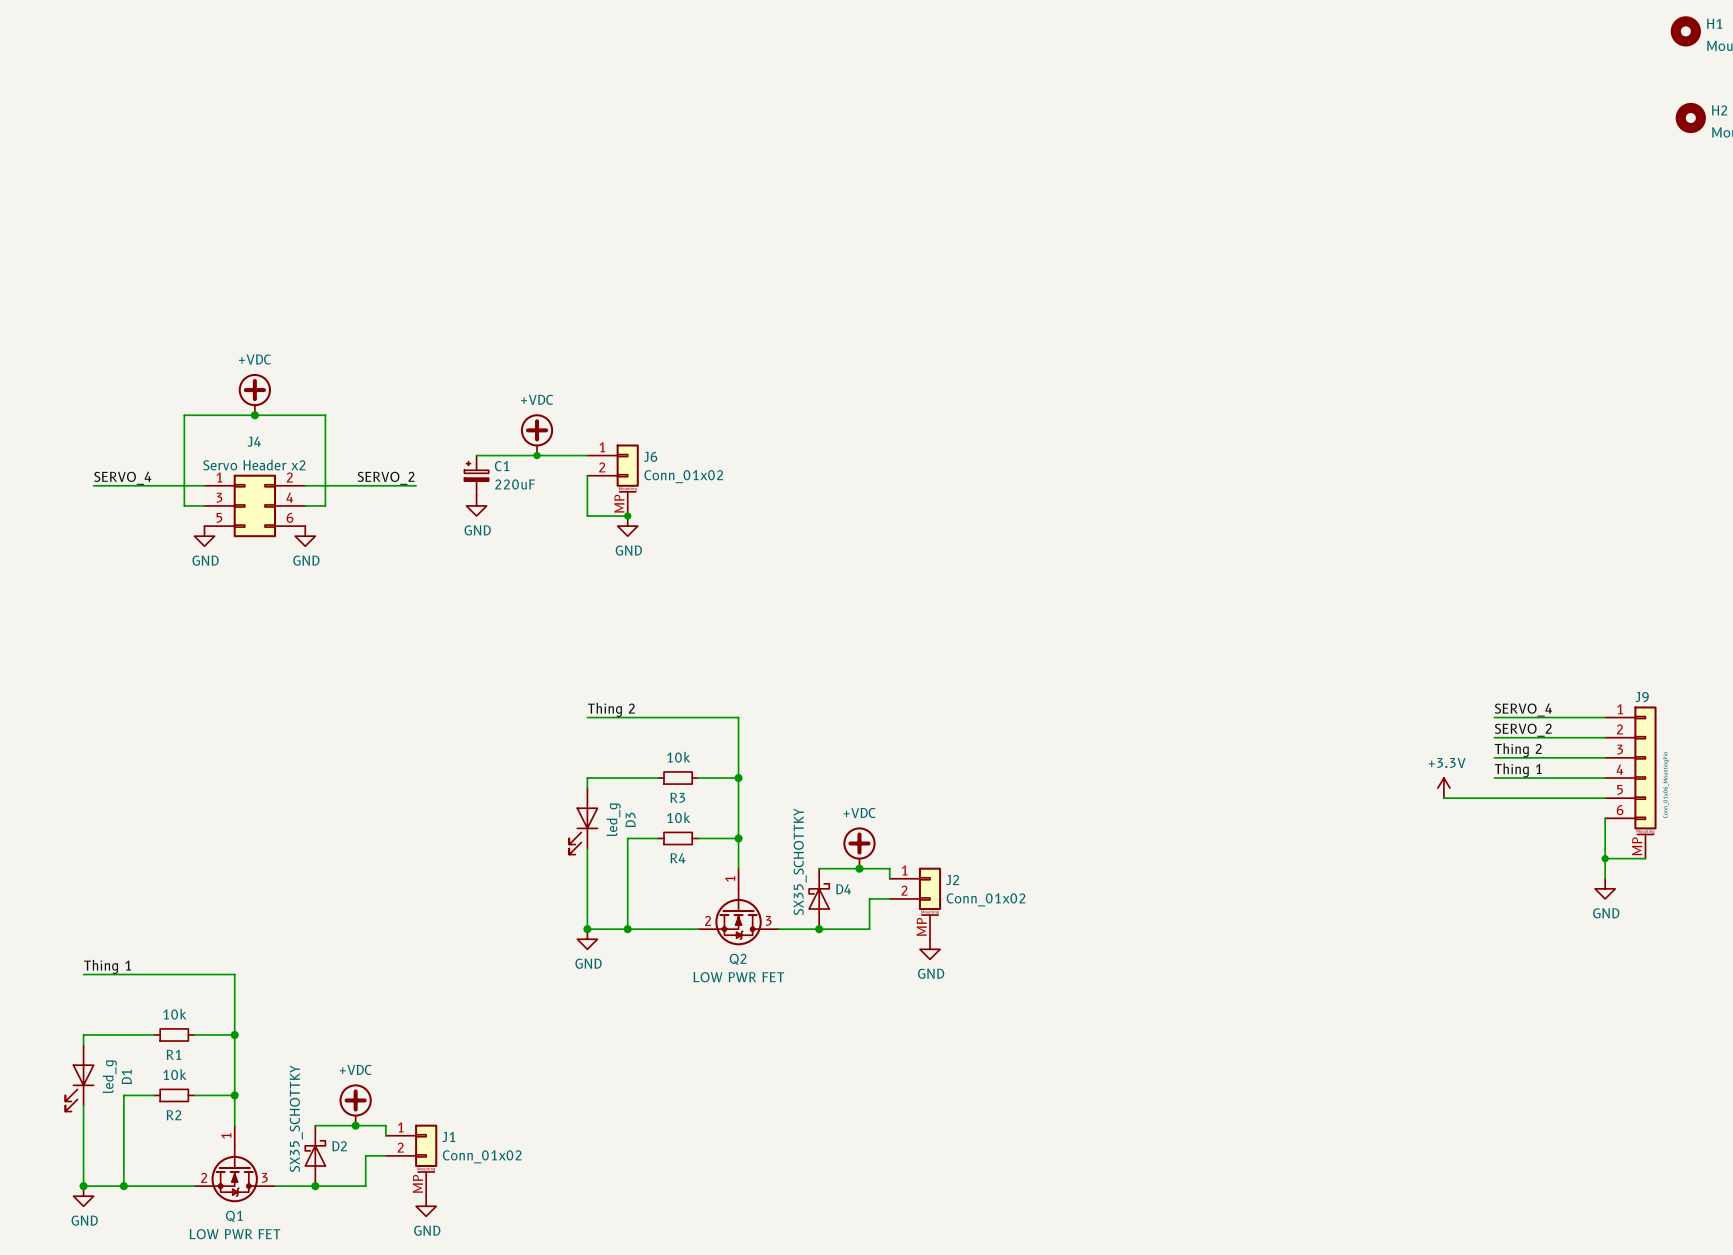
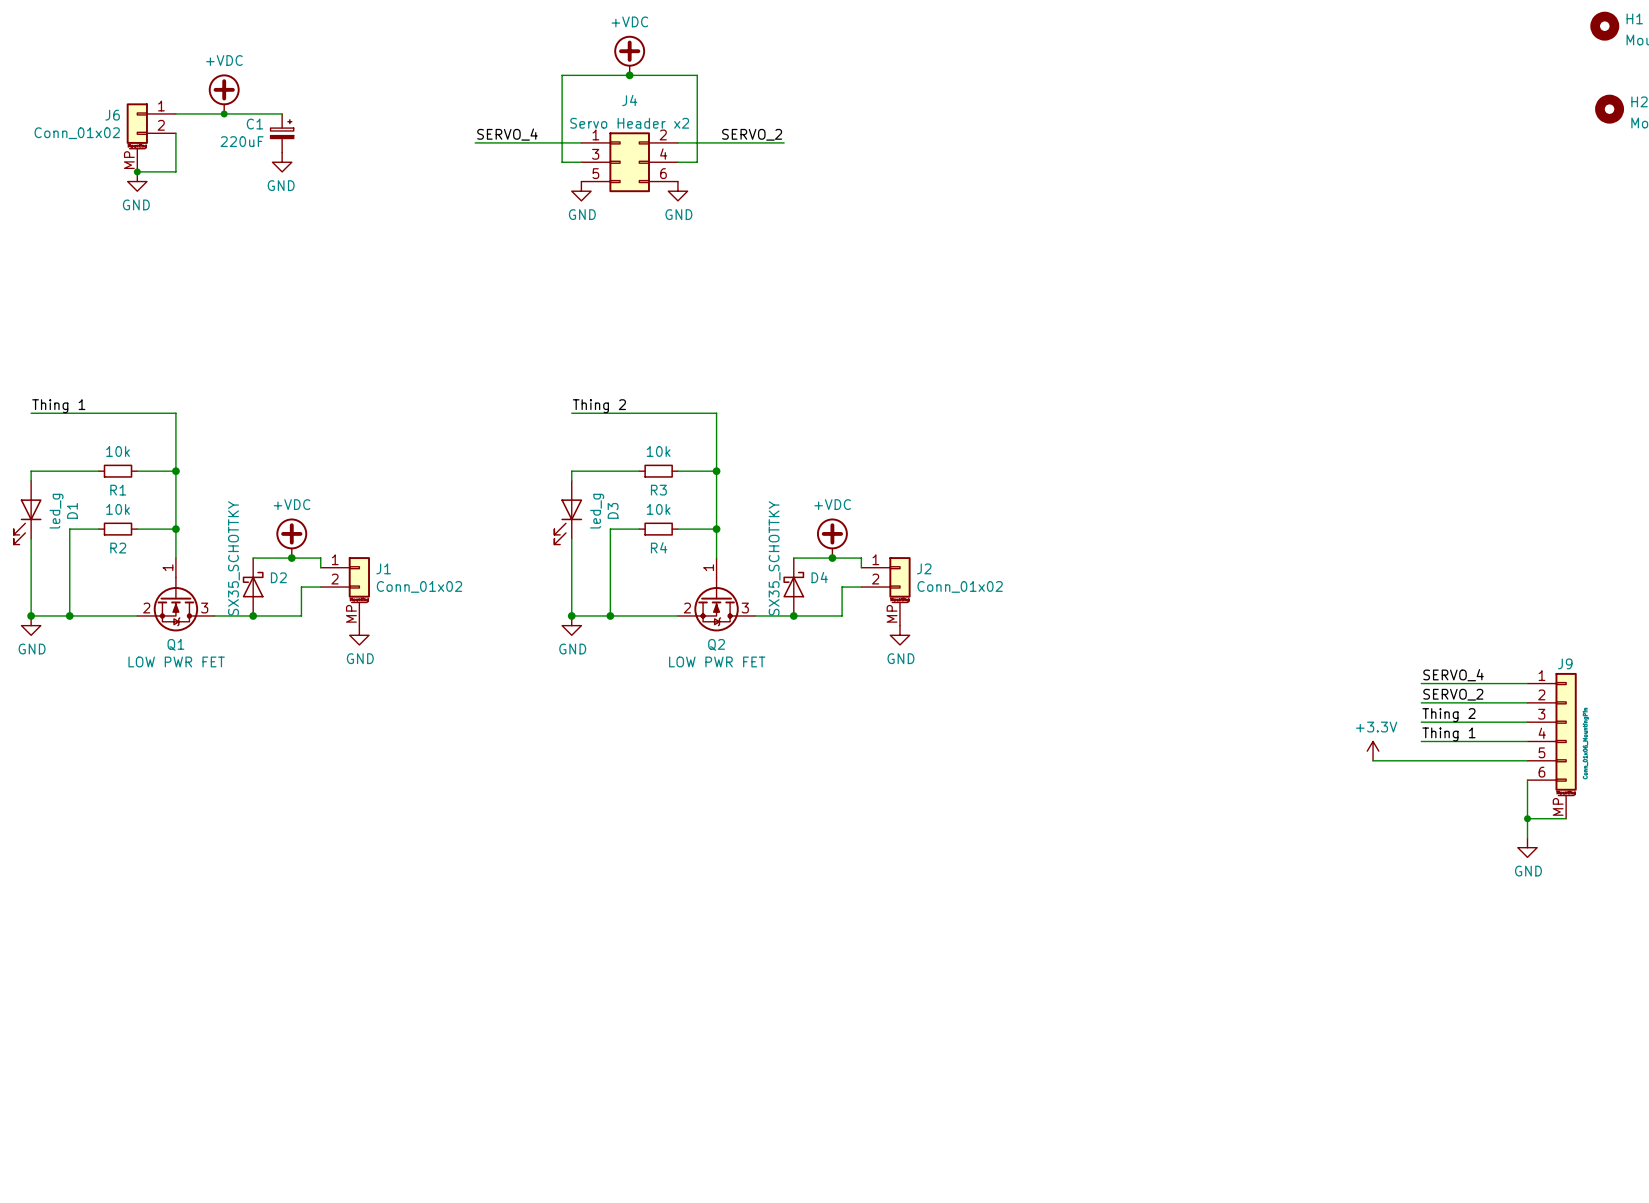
power symbol: none -> +VDC (629, 55)
junction: none -> (629, 75)
power symbol: none -> +VDC (224, 94)
wire: none -> (175, 113) (282, 113)
junction: none -> (224, 113)
wire: none -> (175, 133) (175, 171) (137, 171)
label: none -> SERVO_4 (507, 134)
label: none -> SERVO_2 (752, 134)
wire: none -> (475, 142) (581, 142)
wire: none -> (677, 142) (784, 142)
power symbol: none -> GND (282, 162)
wire: none -> (581, 162) (562, 162) (562, 75) (697, 75) (697, 162) (677, 162)
junction: none -> (137, 171)
power symbol: none -> GND (137, 181)
power symbol: none -> GND (581, 191)
power symbol: none -> GND (677, 191)
power symbol: +VDC (254, 394) -> none
junction: (254, 415) -> none
label: none -> Thing 1 (58, 406)
label: none -> Thing 2 (599, 406)
power symbol: +VDC (537, 434) -> none
wire: none -> (31, 413) (175, 413) (175, 558)
wire: none -> (571, 413) (716, 413) (716, 558)
wire: (476, 455) (587, 455) -> none
junction: (537, 455) -> none
J6 flip: as is (627, 468) -> left-right (137, 126)
C1 flip: as is (476, 471) -> left-right (282, 129)
C1 position: (476, 475) -> (282, 133)
wire: (587, 475) (587, 516) (627, 516) -> none
label: SERVO_4 (122, 478) -> none
label: SERVO_2 (386, 478) -> none
J6 position: (613, 480) -> (151, 137)
wire: (93, 485) (204, 485) -> none
wire: (305, 485) (416, 485) -> none
wire: none -> (98, 471) (31, 471) (31, 480)
wire: none -> (137, 471) (175, 471)
junction: none -> (175, 471)
wire: none -> (639, 471) (571, 471) (571, 480)
wire: none -> (677, 471) (716, 471)
junction: none -> (716, 471)
wire: (204, 505) (184, 505) (184, 415) (325, 415) (325, 505) (305, 505) -> none
J4 position: (254, 505) -> (629, 162)
power symbol: GND (476, 505) -> none
junction: (627, 516) -> none
power symbol: GND (627, 526) -> none
power symbol: GND (204, 536) -> none
power symbol: GND (305, 536) -> none
wire: none -> (98, 529) (69, 529) (69, 615)
wire: none -> (137, 529) (175, 529)
junction: none -> (175, 529)
wire: none -> (639, 529) (610, 529) (610, 615)
wire: none -> (677, 529) (716, 529)
junction: none -> (716, 529)
power symbol: none -> +VDC (291, 538)
power symbol: none -> +VDC (832, 538)
wire: none -> (31, 538) (31, 615) (137, 615)
wire: none -> (571, 538) (571, 615) (677, 615)
wire: none -> (253, 558) (320, 558) (320, 567)
junction: none -> (291, 558)
wire: none -> (793, 558) (861, 558) (861, 567)
junction: none -> (832, 558)
wire: none -> (320, 587) (301, 587) (301, 615) (214, 615)
wire: none -> (861, 587) (842, 587) (842, 615) (755, 615)
junction: none -> (31, 615)
junction: none -> (69, 615)
junction: none -> (253, 615)
junction: none -> (571, 615)
junction: none -> (610, 615)
junction: none -> (793, 615)
power symbol: none -> GND (31, 625)
power symbol: none -> GND (571, 625)
power symbol: none -> GND (359, 635)
power symbol: none -> GND (899, 635)
label: Thing 2 (611, 709) -> none
wire: (587, 717) (738, 717) (738, 868) -> none
wire: (657, 778) (587, 778) (587, 788) -> none
R3 position: (678, 778) -> (658, 471)
wire: (698, 778) (738, 778) -> none
junction: (738, 778) -> none
D3 position: (583, 821) -> (568, 512)
wire: (657, 838) (627, 838) (627, 929) -> none
R4 position: (678, 838) -> (658, 529)
wire: (698, 838) (738, 838) -> none
junction: (738, 838) -> none
wire: (587, 848) (587, 929) (698, 929) -> none
power symbol: +VDC (859, 848) -> none
wire: (819, 868) (889, 868) (889, 878) -> none
junction: (859, 868) -> none
D4 position: (819, 898) -> (793, 587)
wire: (889, 898) (869, 898) (869, 929) (778, 929) -> none
J2 position: (915, 903) -> (885, 591)
Q2 position: (738, 907) -> (716, 594)
junction: (587, 929) -> none
junction: (627, 929) -> none
junction: (819, 929) -> none
power symbol: GND (587, 939) -> none
power symbol: GND (930, 949) -> none
label: Thing 1 (107, 966) -> none
wire: (83, 974) (234, 974) (234, 1125) -> none
wire: (154, 1034) (83, 1034) (83, 1045) -> none
R1 position: (174, 1034) -> (118, 471)
wire: (194, 1034) (234, 1034) -> none
junction: (234, 1034) -> none
D1 position: (79, 1078) -> (27, 512)
wire: (154, 1095) (123, 1095) (123, 1186) -> none
R2 position: (174, 1095) -> (118, 529)
wire: (194, 1095) (234, 1095) -> none
junction: (234, 1095) -> none
wire: (83, 1105) (83, 1186) (194, 1186) -> none
power symbol: +VDC (355, 1105) -> none
wire: (315, 1125) (385, 1125) (385, 1135) -> none
junction: (355, 1125) -> none
D2 position: (315, 1155) -> (253, 587)
wire: (385, 1155) (365, 1155) (365, 1186) (275, 1186) -> none
J1 position: (411, 1160) -> (345, 591)
Q1 position: (234, 1163) -> (175, 594)
junction: (83, 1186) -> none
junction: (123, 1186) -> none
junction: (315, 1186) -> none
power symbol: GND (83, 1196) -> none
power symbol: GND (426, 1206) -> none

